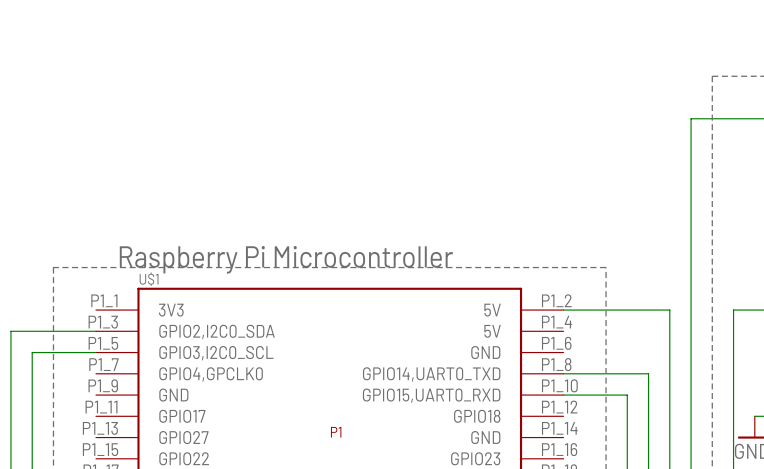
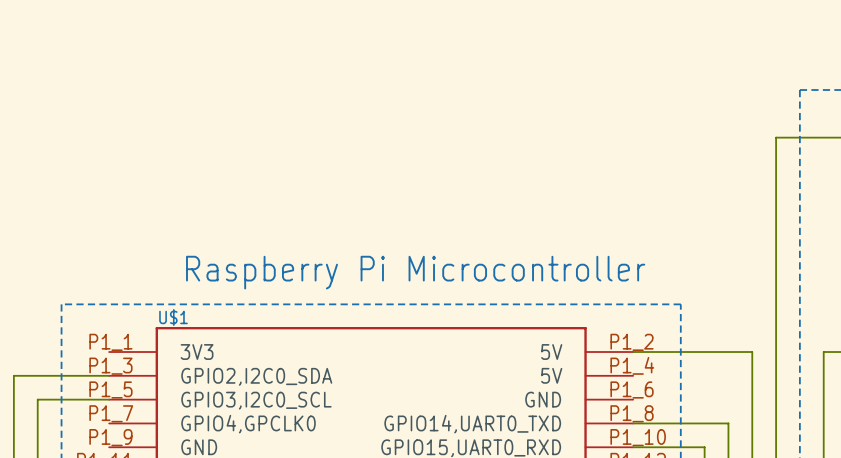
text position: Raspberry Pi Microcontroller (286, 259) -> Raspberry Pi Microcontroller (415, 272)

